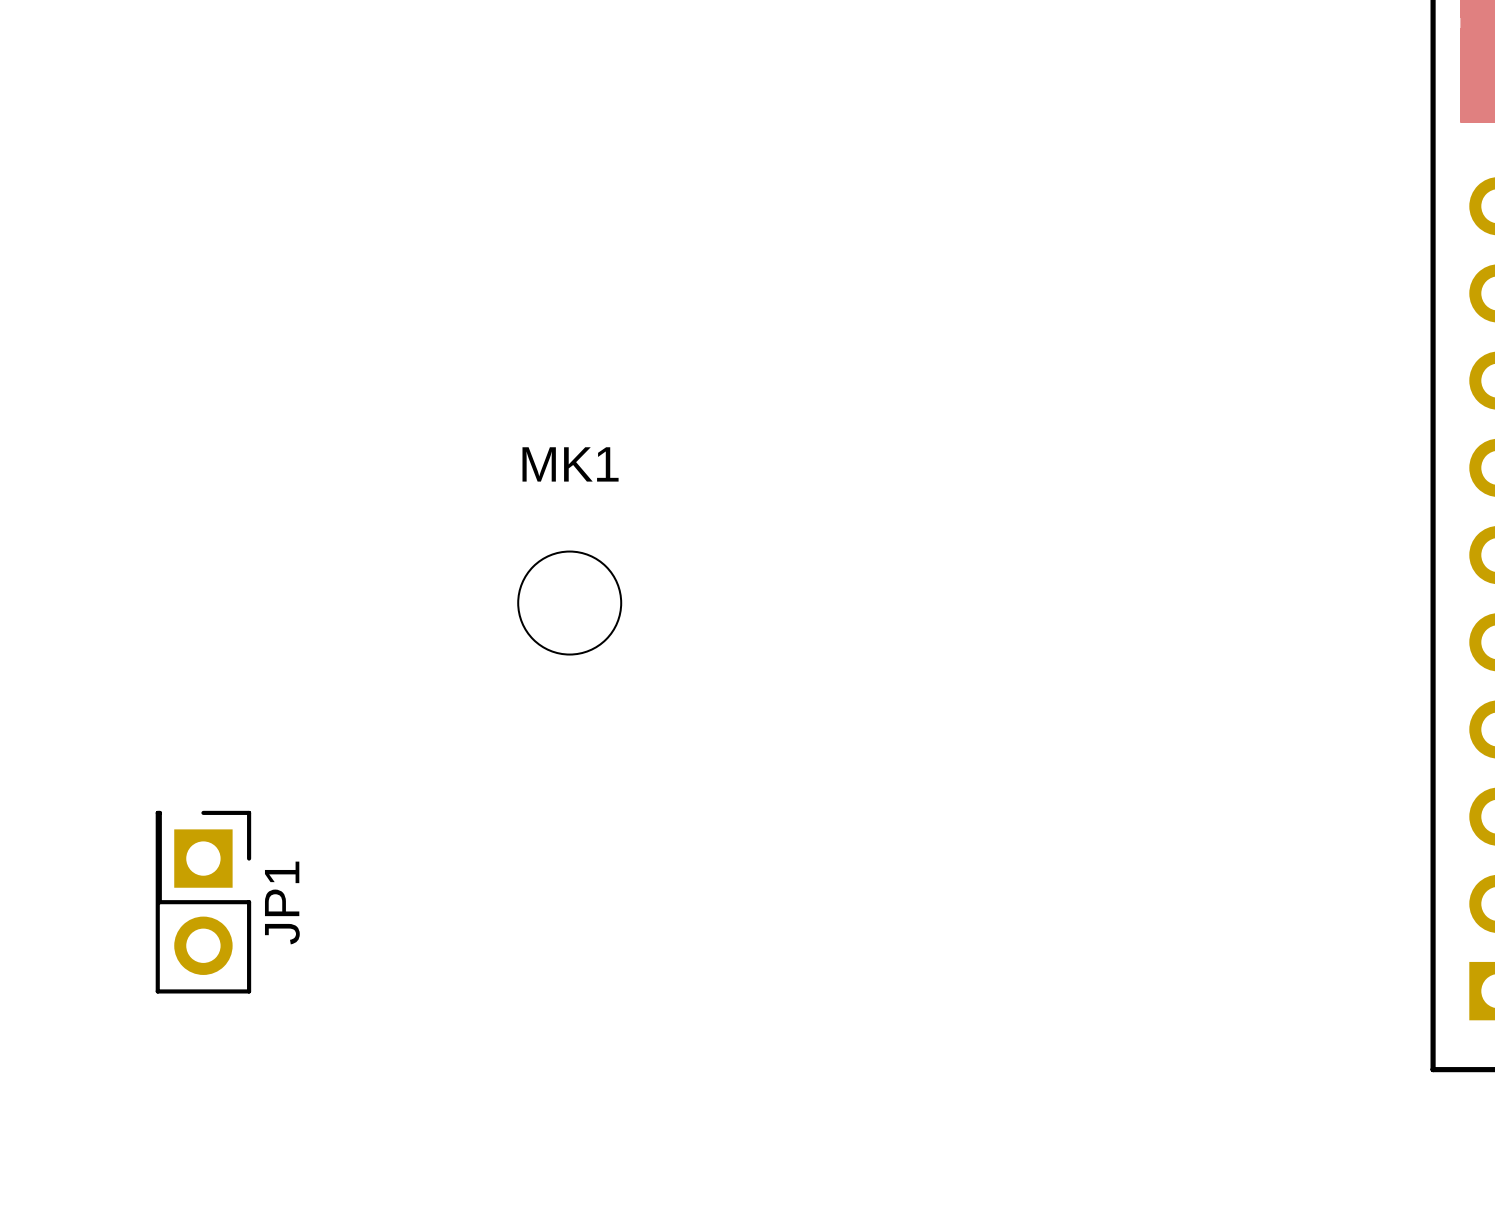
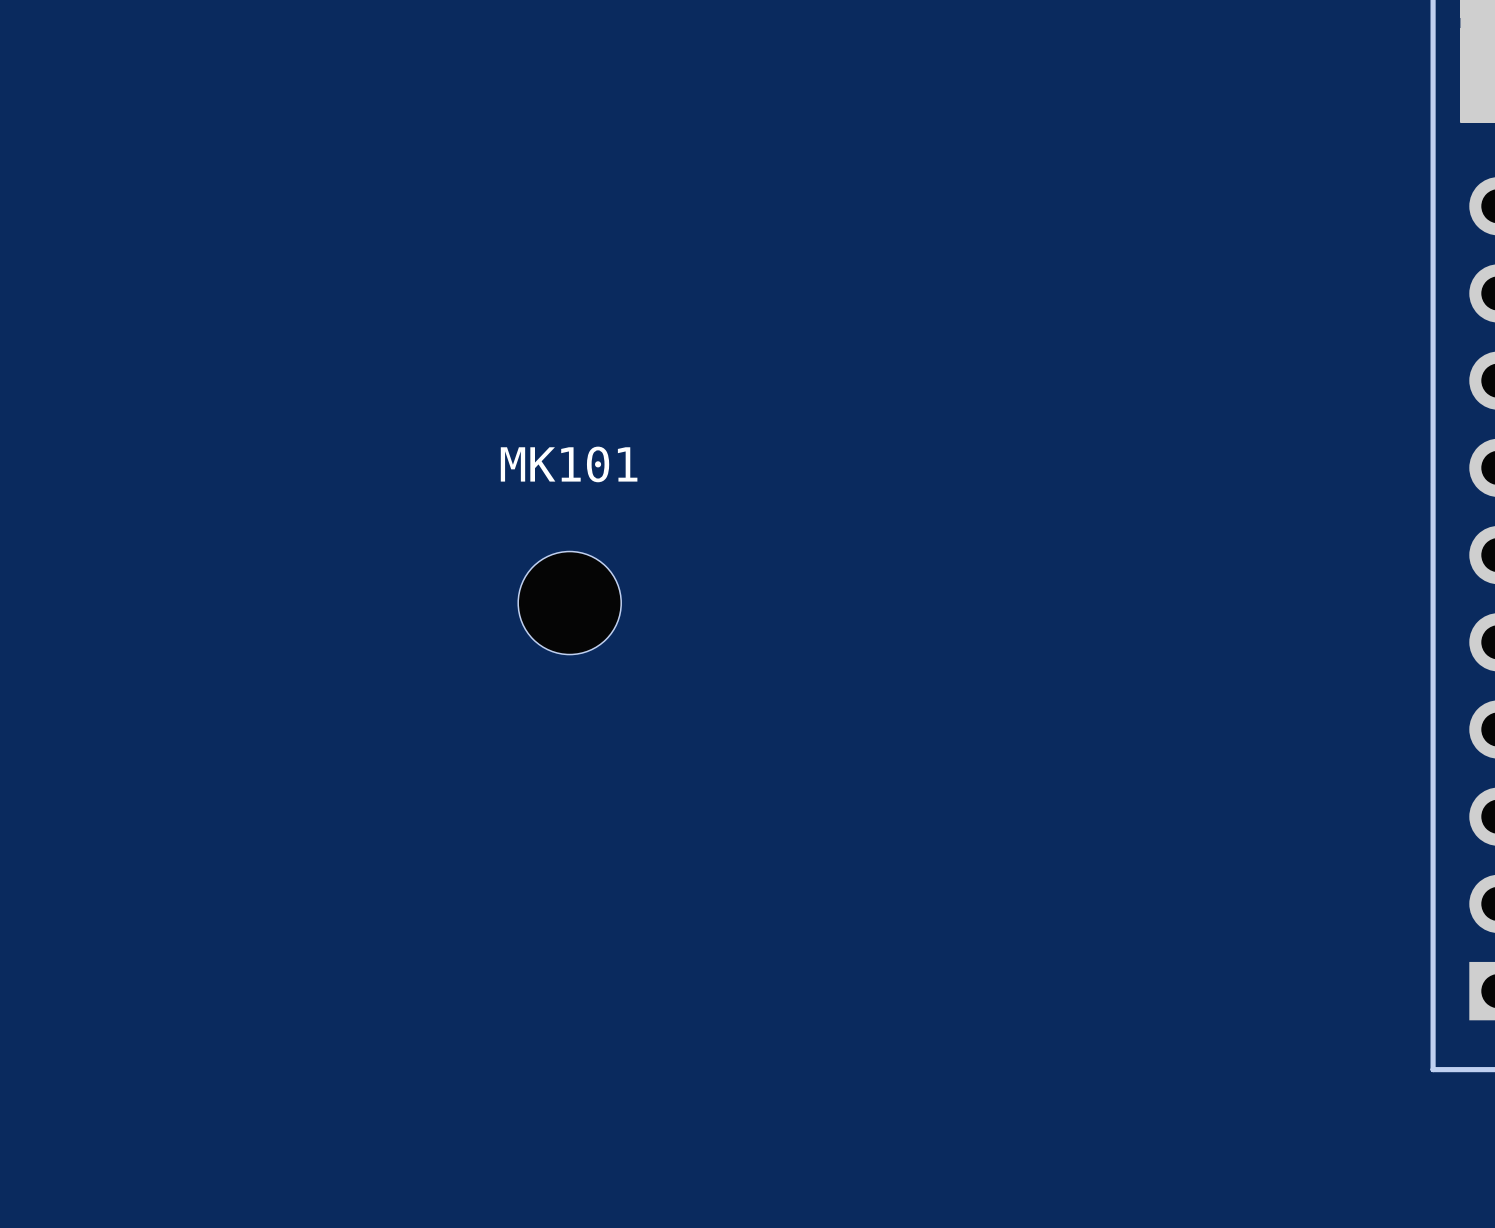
MK1 name: MK1 (570, 464) -> MK101 (569, 464)
JP1: (203, 902) -> none

